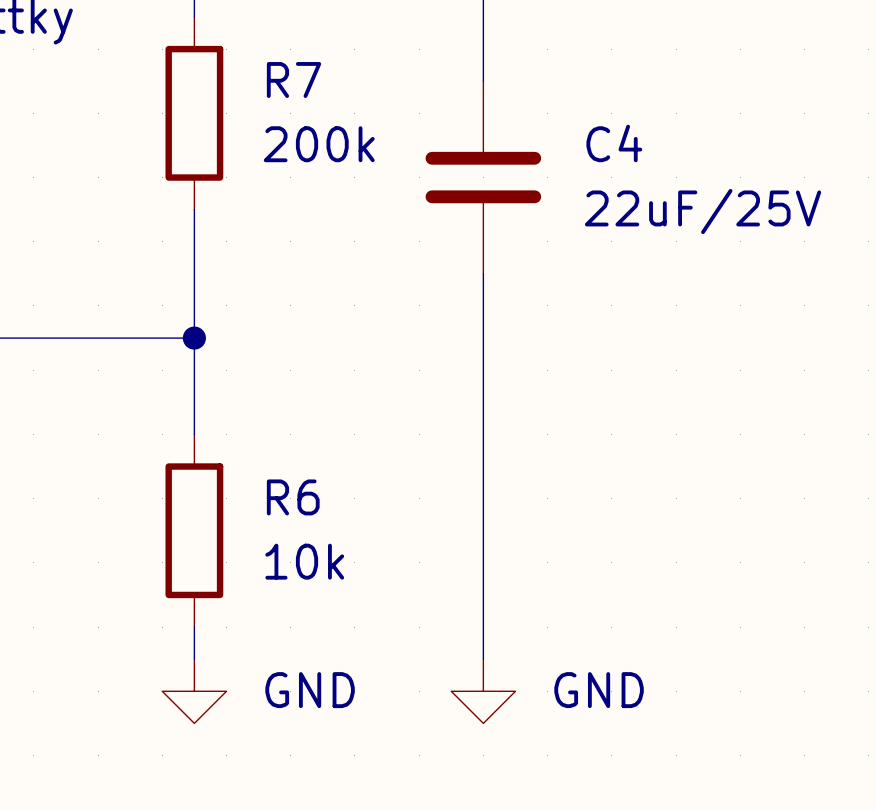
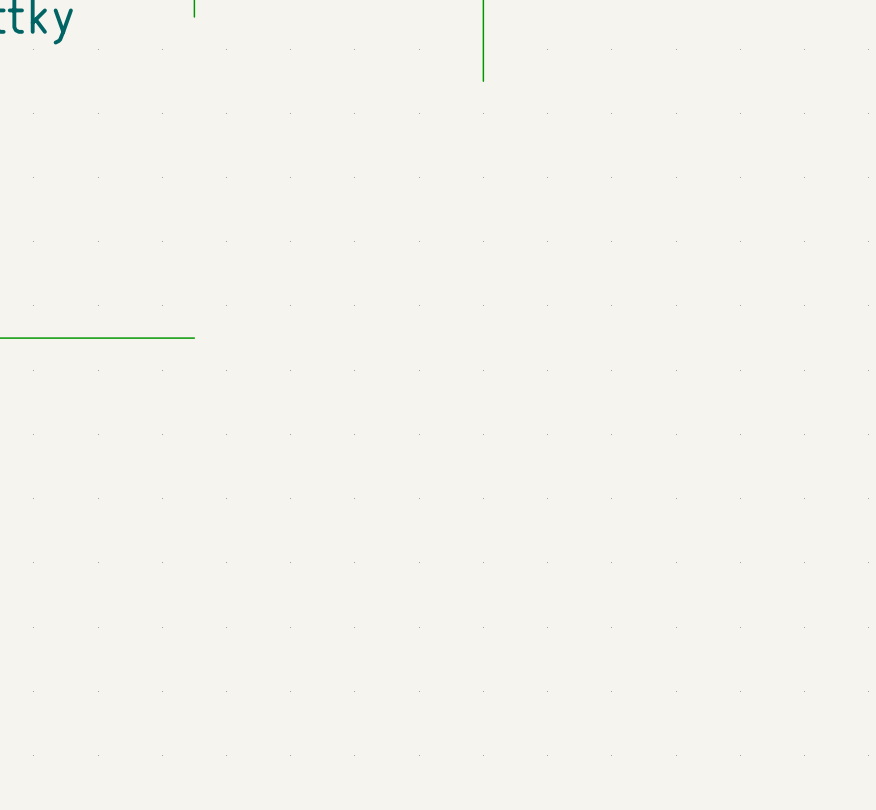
R7: 200k (194, 113) -> none
C4: 22uF/25V (483, 177) -> none
wire: (194, 209) (194, 434) -> none
wire: (483, 273) (483, 659) -> none
junction: (194, 338) -> none
R6: 10k (194, 530) -> none
wire: (194, 627) (194, 659) -> none
power symbol: GND (194, 691) -> none
power symbol: GND (483, 691) -> none

